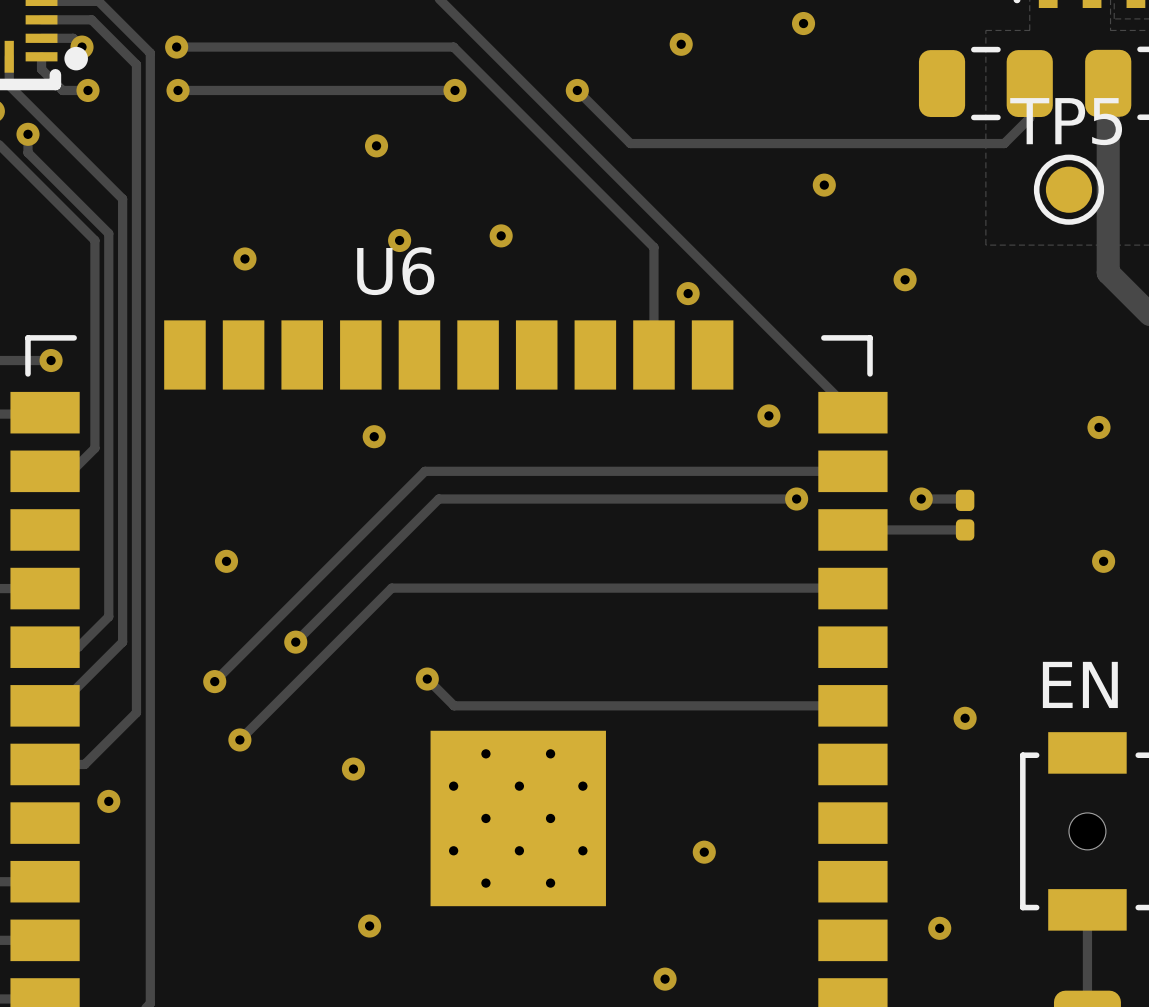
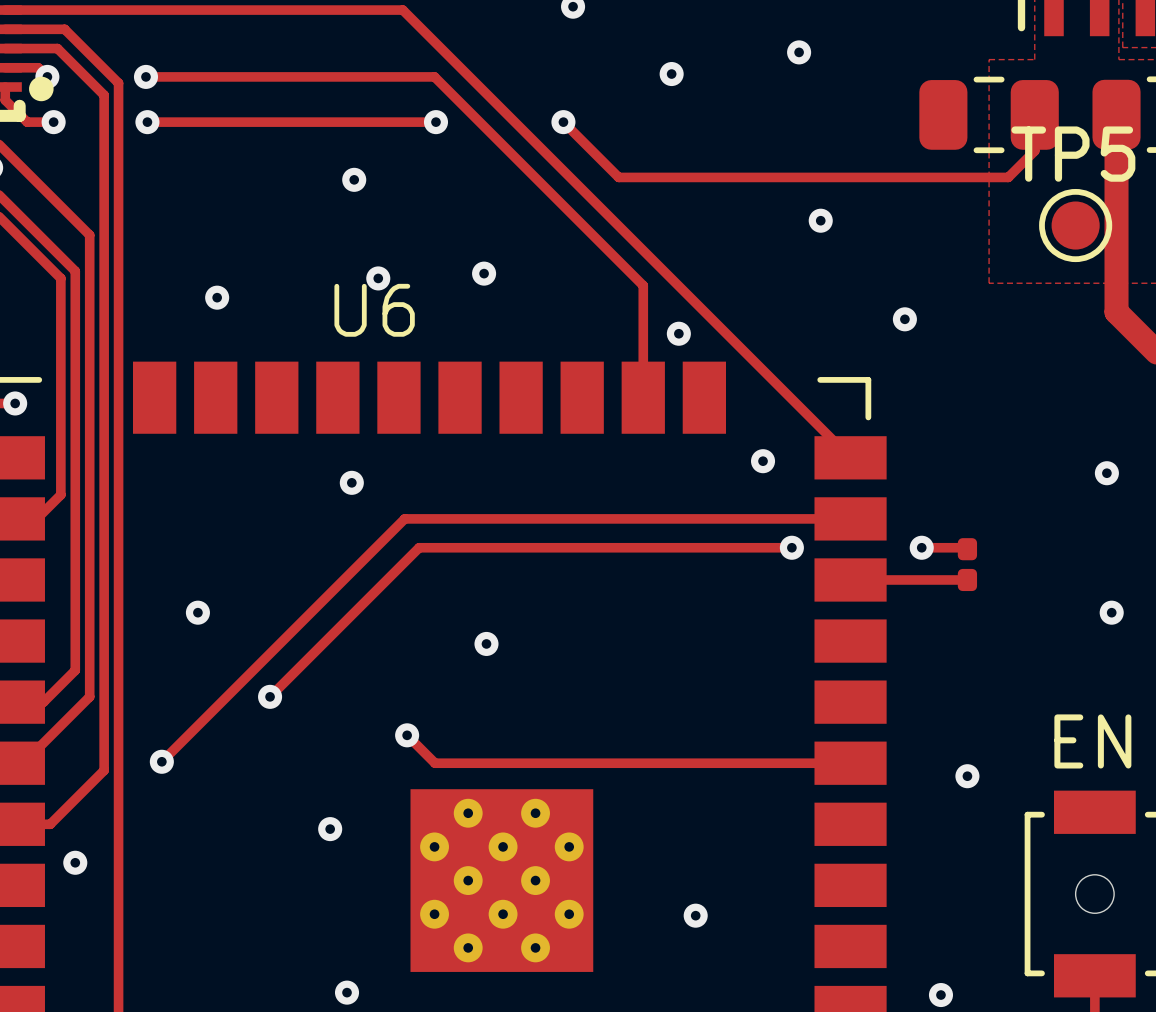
track: (852, 588) (391, 588) (239, 739) -> none
via: none -> (486, 643)
track: none -> (185, 737) (161, 761)
via position: (214, 681) -> (161, 761)
via: (239, 739) -> none

